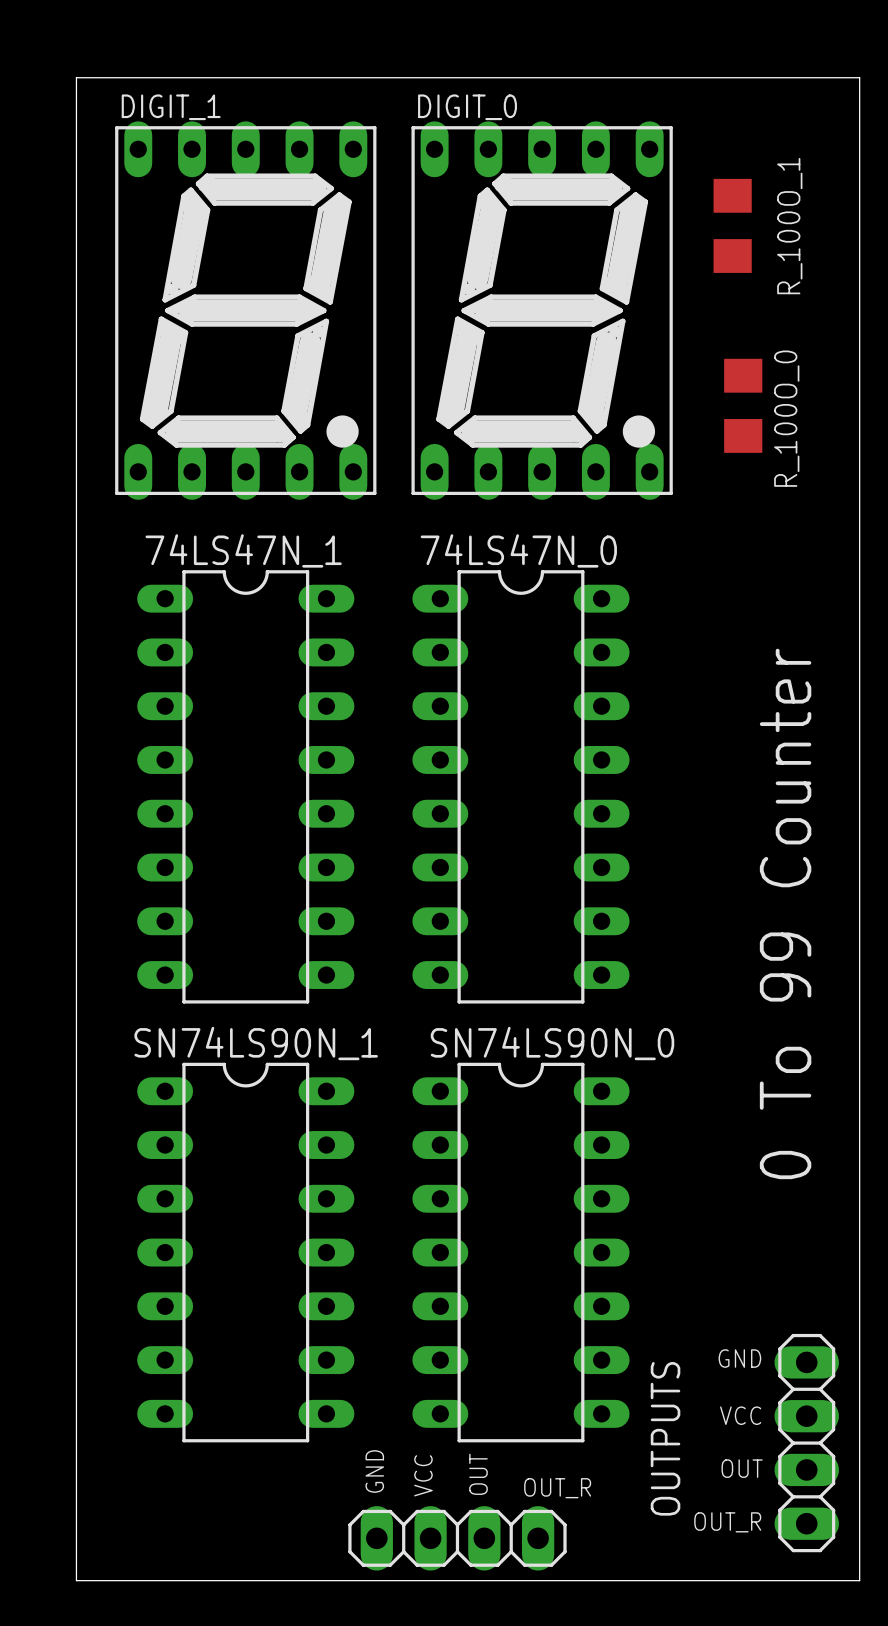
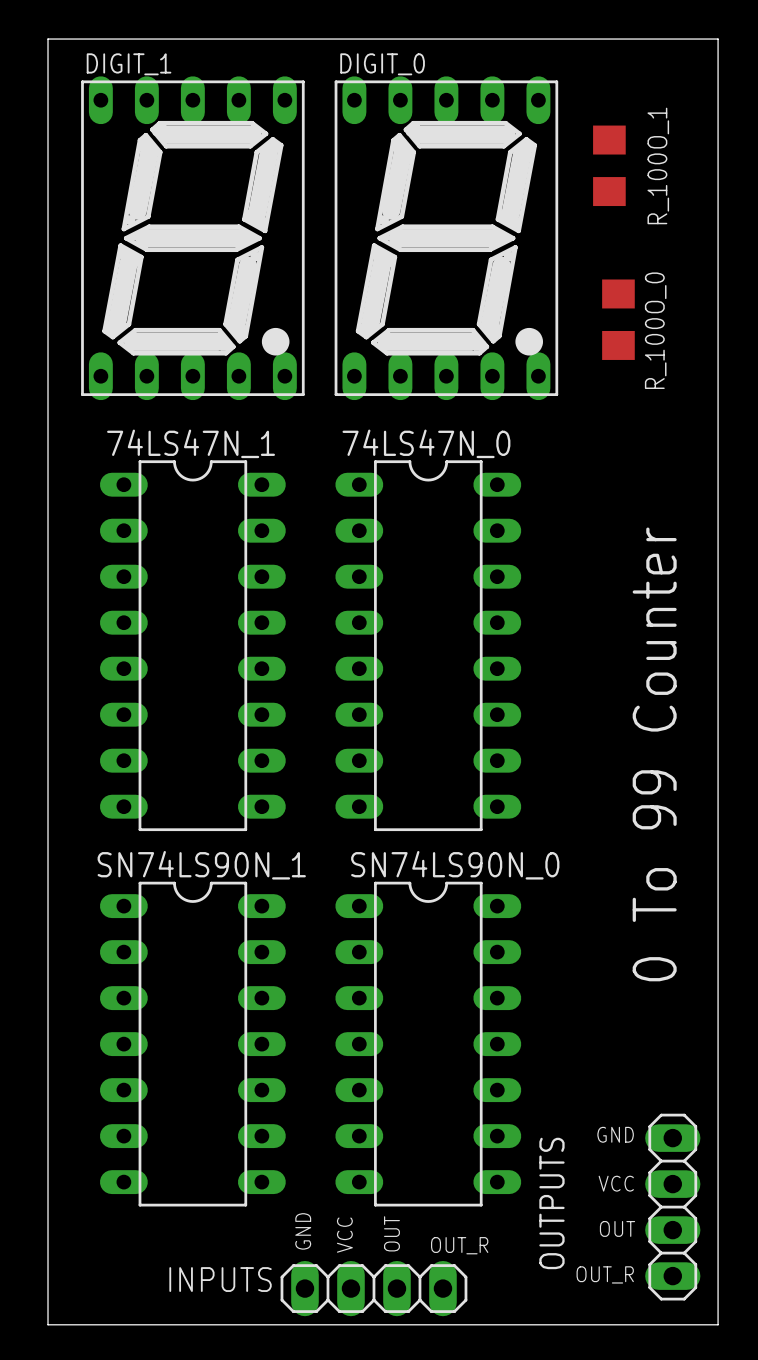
text: none -> INPUTS (220, 1279)

